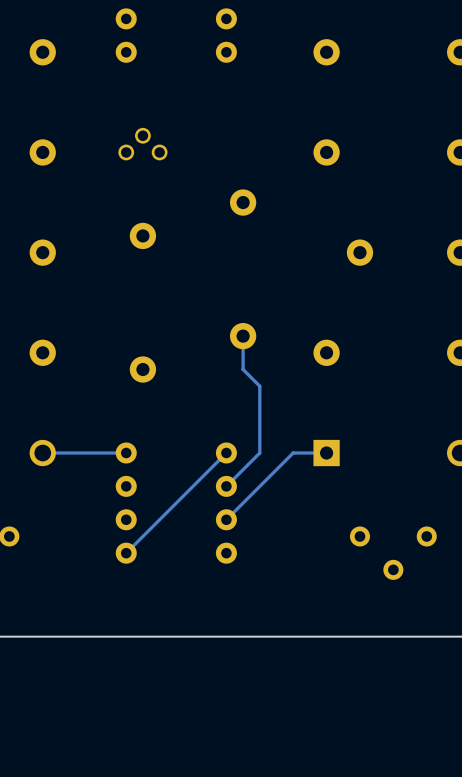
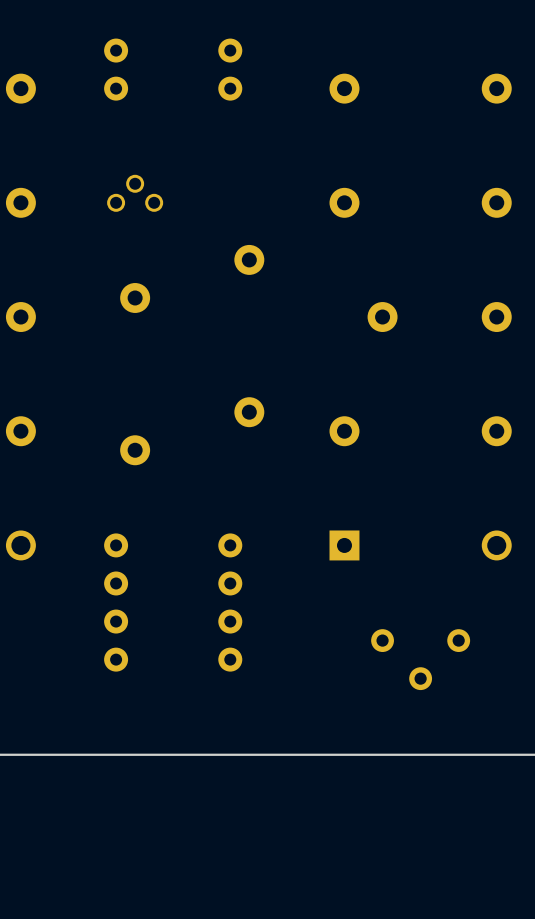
track: (243, 336) (243, 369) (259, 386) (259, 452) (226, 486) -> none
track: (226, 452) (126, 553) -> none
track: (126, 453) (42, 453) -> none
track: (326, 453) (293, 453) (226, 519) -> none

